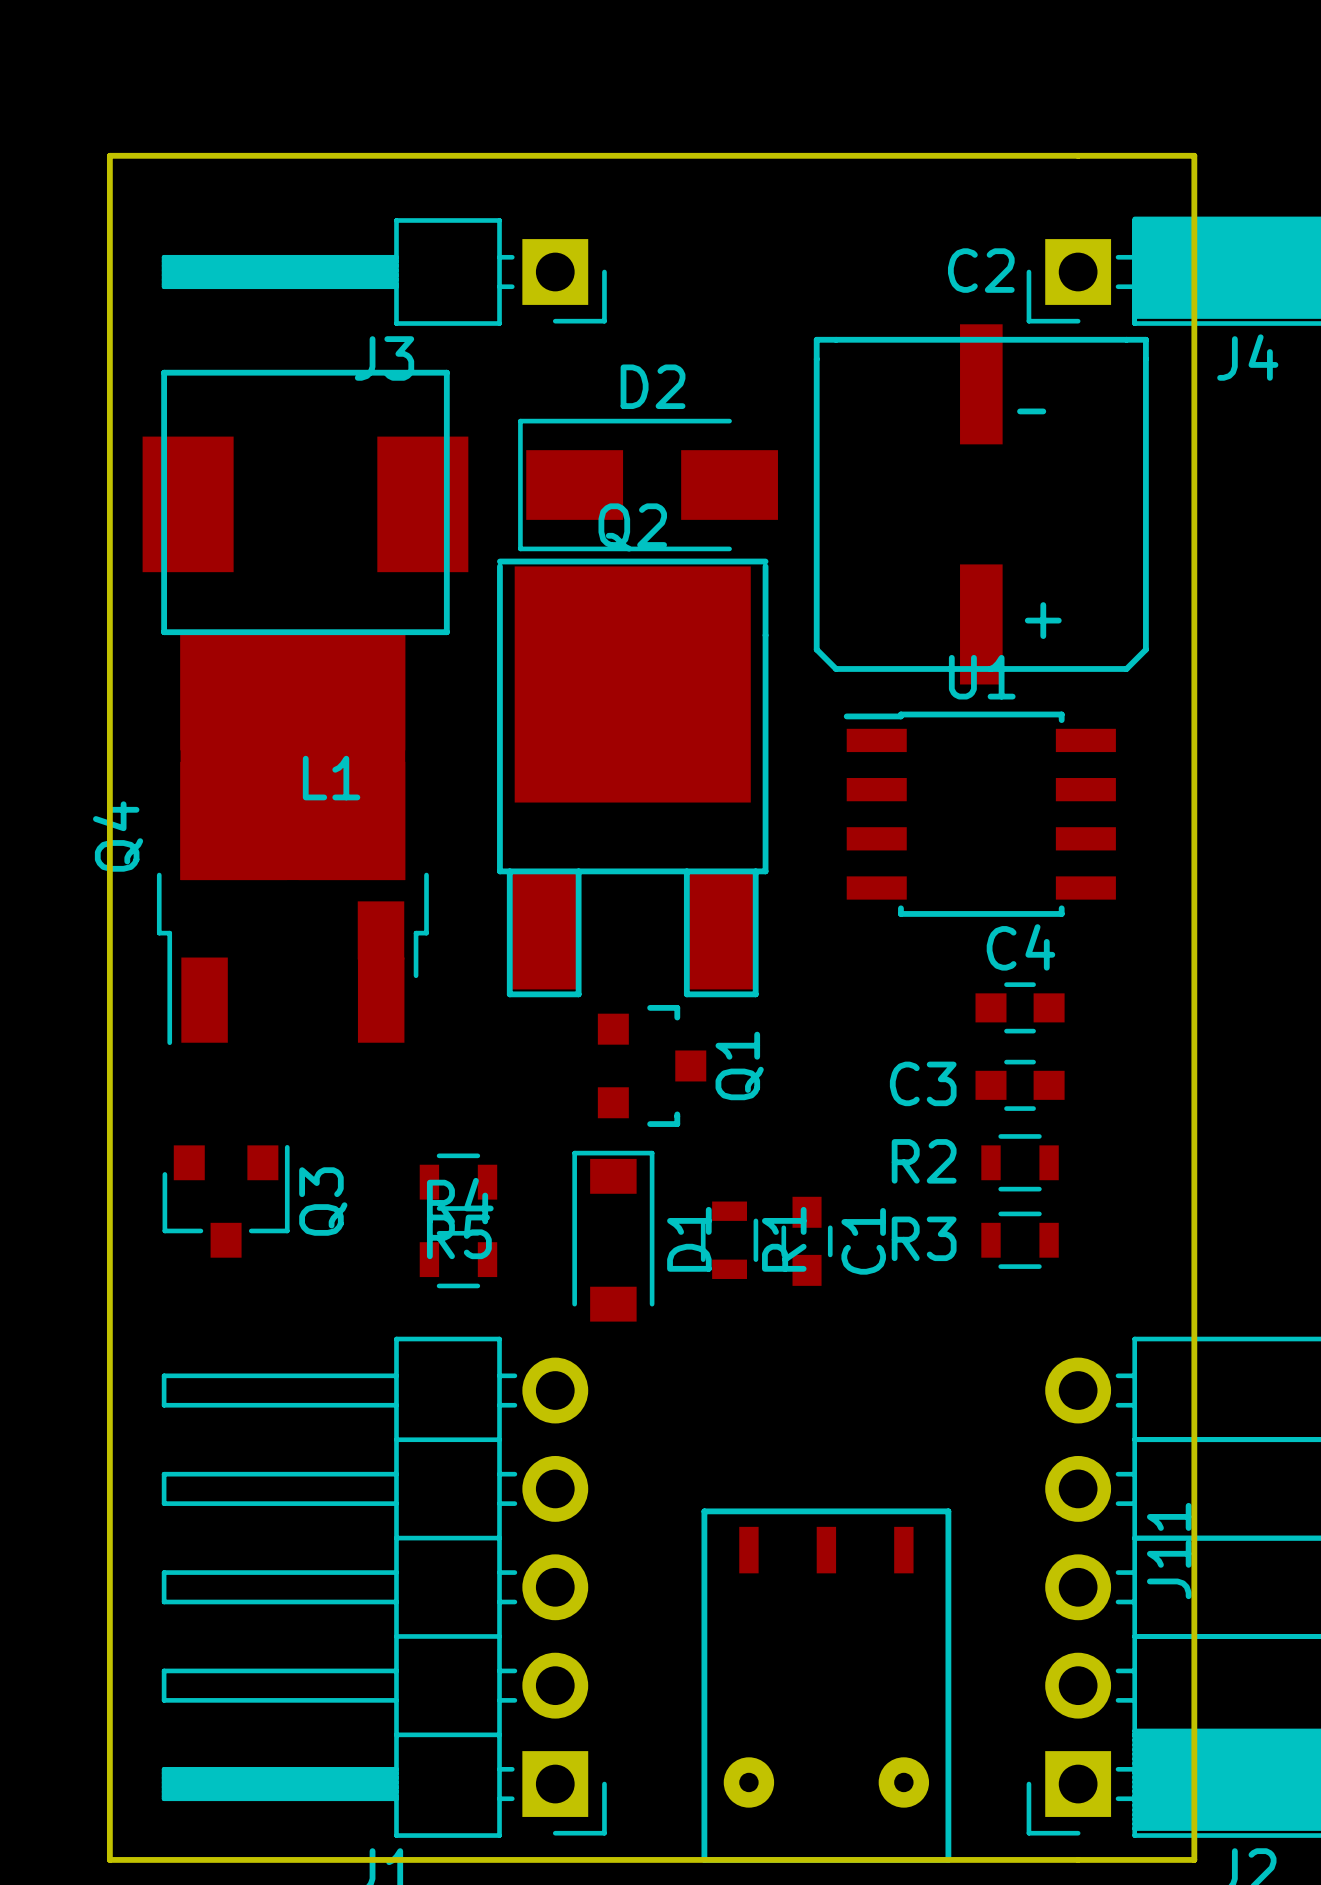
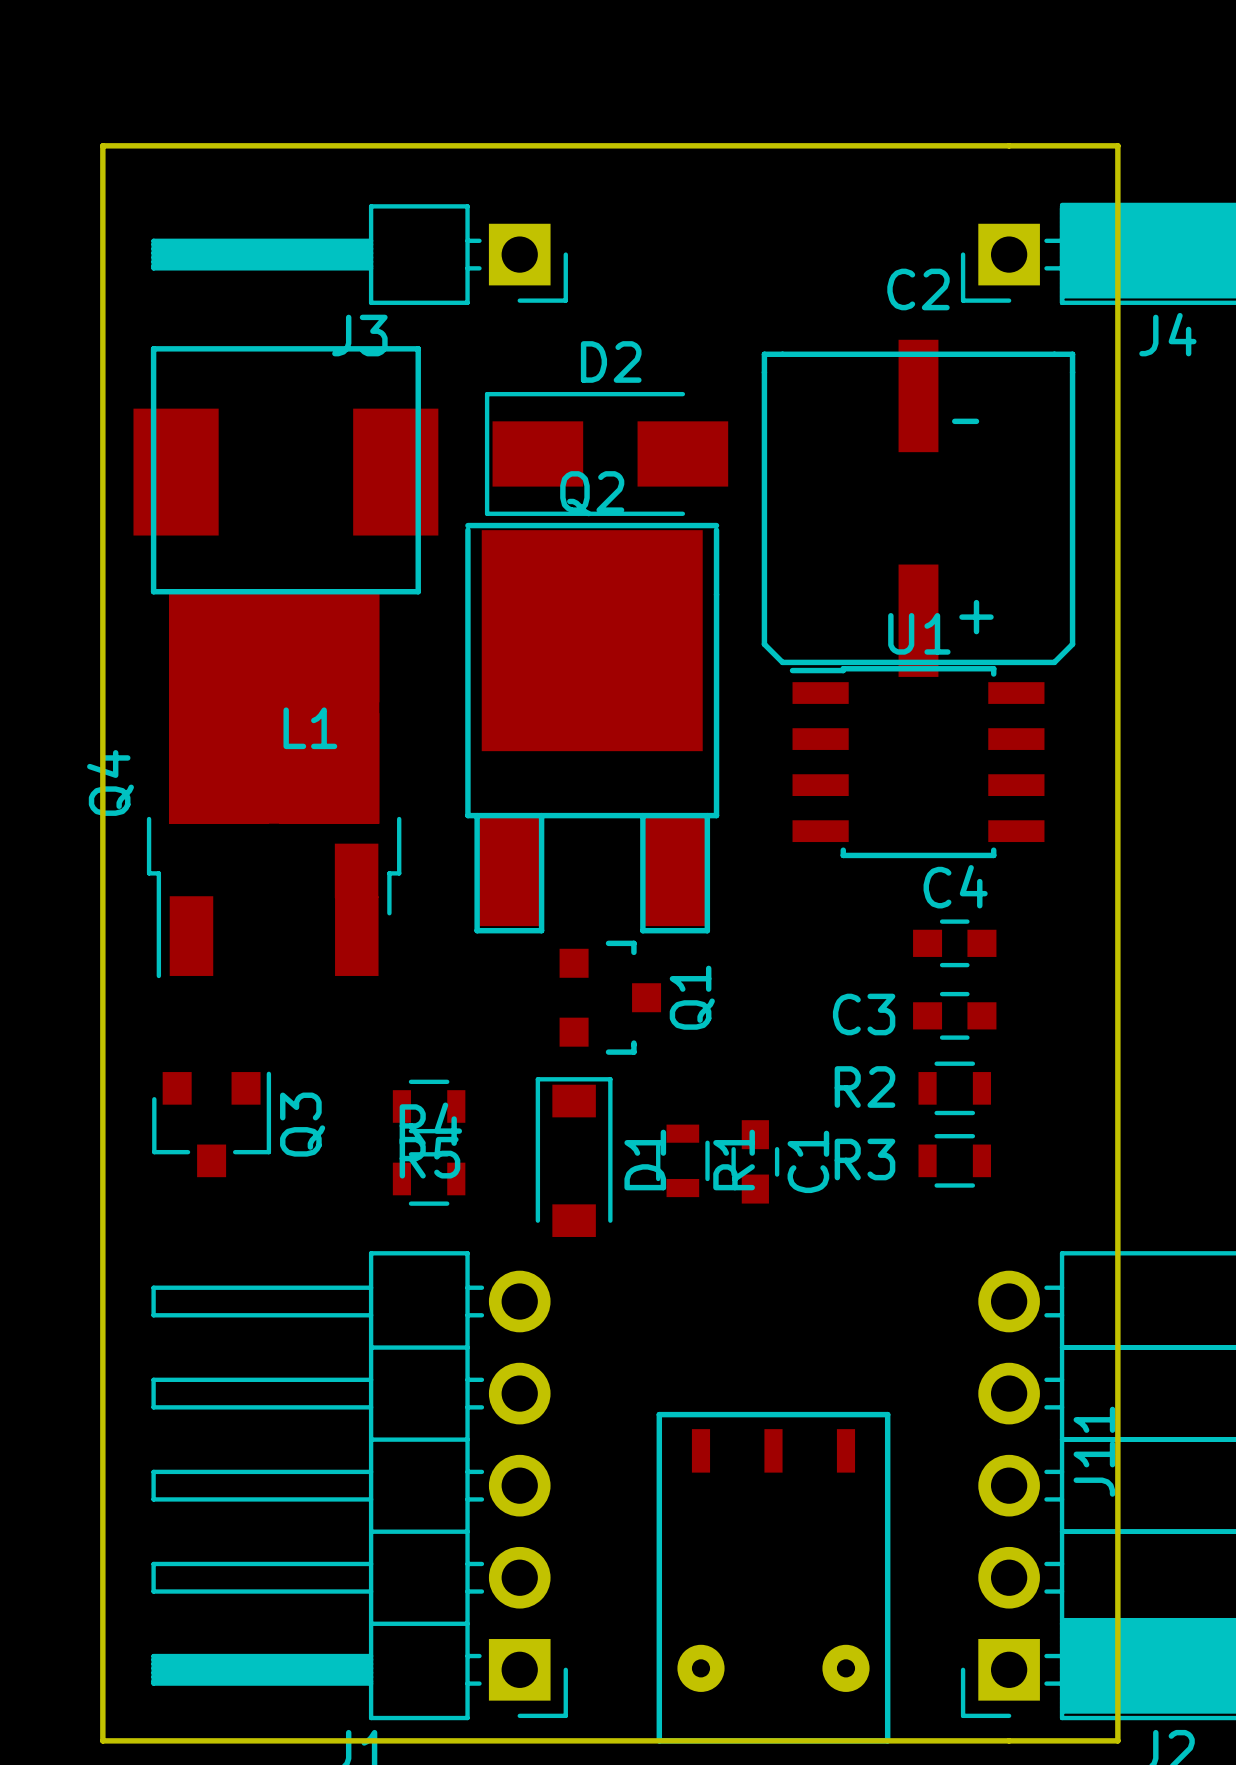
C2 position: (981, 504) -> (918, 508)

